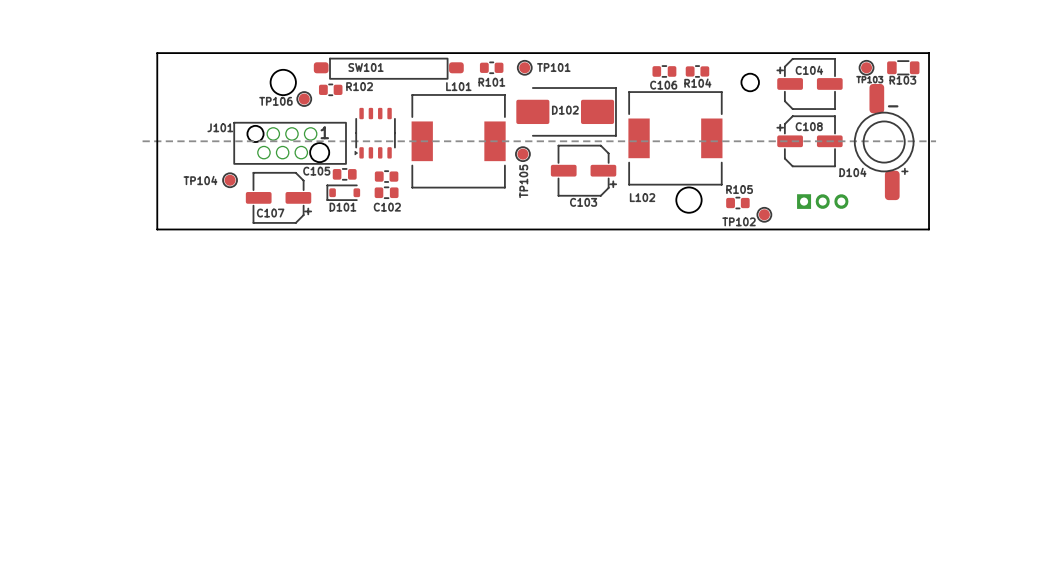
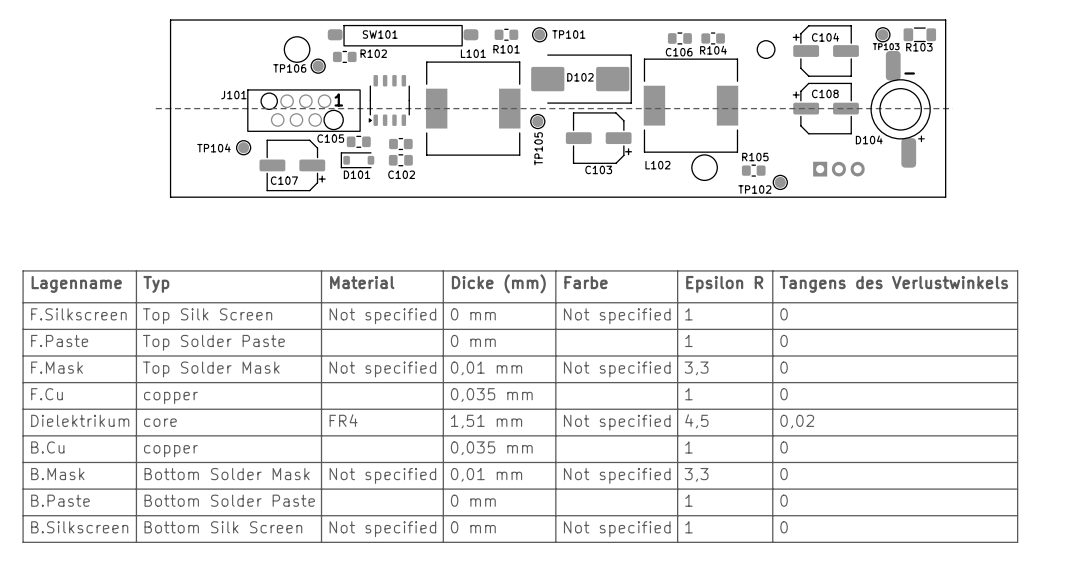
line: none -> (23, 270) (23, 542) (1017, 542) (1017, 270) (23, 270)
line: none -> (136, 270) (136, 542)
line: none -> (321, 270) (321, 542)
line: none -> (443, 270) (443, 542)
line: none -> (555, 270) (555, 542)
line: none -> (677, 270) (677, 542)
line: none -> (772, 270) (772, 542)
text: none -> Material (362, 282)
text: none -> Farbe (586, 282)
text: none -> Dicke (mm) (498, 283)
text: none -> Lagenname (76, 284)
text: none -> Typ (156, 284)
text: none -> Epsilon R (724, 284)
text: none -> Tangens des Verlustwinkels (893, 284)
line: none -> (23, 302) (1017, 302)
text: none -> F.Silkscreen (78, 314)
text: none -> 0 mm (473, 314)
text: none -> 1 (688, 314)
text: none -> 0 (784, 314)
text: none -> Top Silk Screen (207, 316)
text: none -> Not specified (382, 316)
text: none -> Not specified (617, 316)
line: none -> (23, 329) (1017, 329)
text: none -> F.Paste (59, 340)
text: none -> 0 mm (473, 340)
text: none -> 1 (688, 340)
text: none -> 0 (784, 340)
text: none -> Top Solder Paste (213, 342)
line: none -> (23, 356) (1017, 356)
text: none -> F.Mask (57, 367)
text: none -> 0,01 mm (486, 368)
text: none -> 3,3 (696, 368)
text: none -> 0 (784, 367)
text: none -> Top Solder Mask (211, 369)
text: none -> Not specified (382, 369)
text: none -> Not specified (617, 369)
line: none -> (23, 382) (1017, 382)
text: none -> F.Cu (47, 394)
text: none -> 1 (688, 394)
text: none -> 0 (784, 394)
text: none -> 0,035 mm (491, 395)
text: none -> copper (170, 397)
line: none -> (23, 409) (1017, 409)
text: none -> FR4 (343, 420)
text: none -> Dielektrikum (80, 420)
text: none -> 1,51 mm (486, 421)
text: none -> 4,5 (696, 421)
text: none -> 0,02 (797, 421)
text: none -> core (160, 422)
text: none -> Not specified (617, 422)
line: none -> (23, 435) (1017, 435)
text: none -> B.Cu (47, 447)
text: none -> 1 (688, 447)
text: none -> 0 (784, 447)
text: none -> 0,035 mm (491, 448)
text: none -> copper (170, 451)
line: none -> (23, 462) (1017, 462)
text: none -> B.Mask (57, 474)
text: none -> Bottom Solder Mask (227, 474)
text: none -> 0,01 mm (486, 474)
text: none -> 3,3 (696, 474)
text: none -> 0 (784, 474)
text: none -> Not specified (382, 475)
text: none -> Not specified (617, 475)
line: none -> (23, 489) (1017, 489)
text: none -> B.Paste (60, 500)
text: none -> Bottom Solder Paste (229, 500)
text: none -> 0 mm (473, 500)
text: none -> 1 (688, 500)
text: none -> 0 (784, 500)
line: none -> (23, 515) (1017, 515)
text: none -> B.Silkscreen (79, 527)
text: none -> Bottom Silk Screen (223, 527)
text: none -> 0 mm (473, 527)
text: none -> 1 (688, 527)
text: none -> 0 (784, 527)
text: none -> Not specified (382, 529)
text: none -> Not specified (617, 529)

